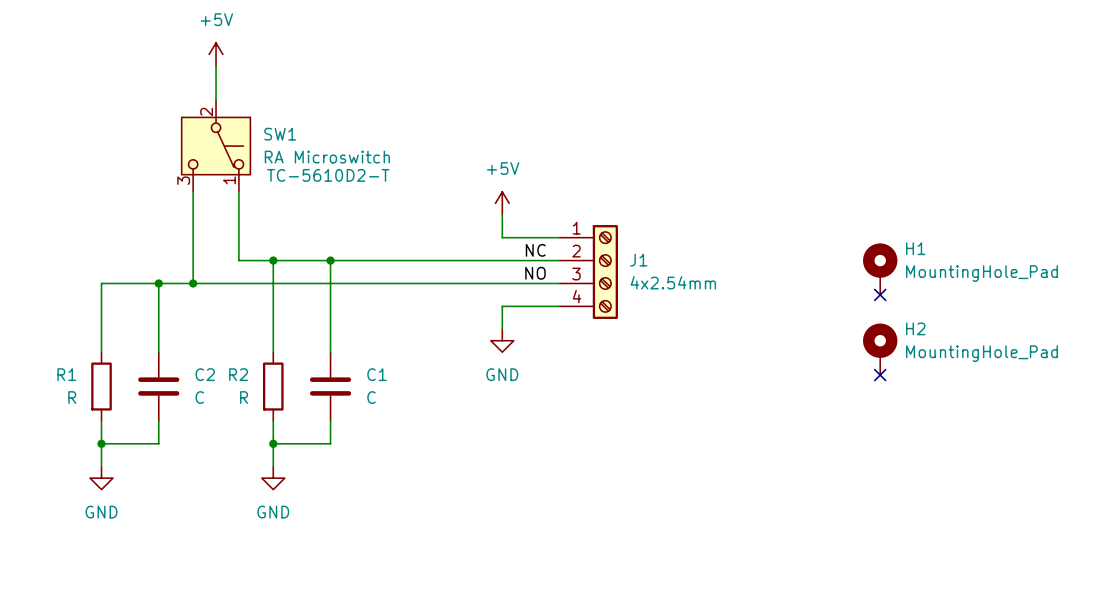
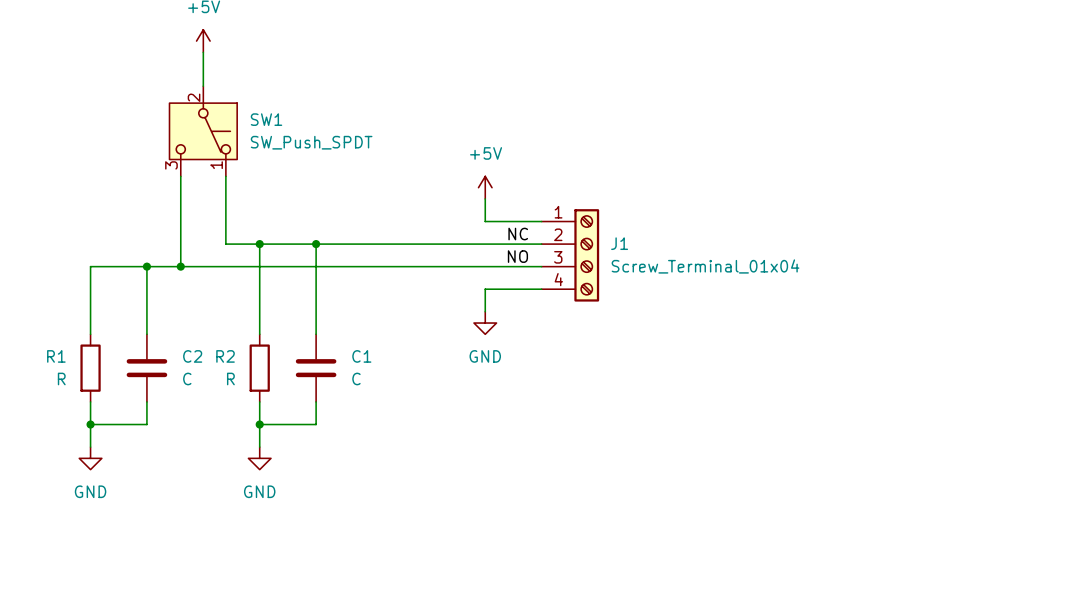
SW1 value: RA Microswitch (327, 157) -> SW_Push_SPDT (311, 142)
SW1 text: TC-5610D2-T (328, 175) -> none
H1: MountingHole_Pad (880, 269) -> none
J1 value: 4x2.54mm (673, 282) -> Screw_Terminal_01x04 (705, 266)
no-connect mark: (880, 294) -> none
H2: MountingHole_Pad (880, 349) -> none
no-connect mark: (880, 375) -> none

